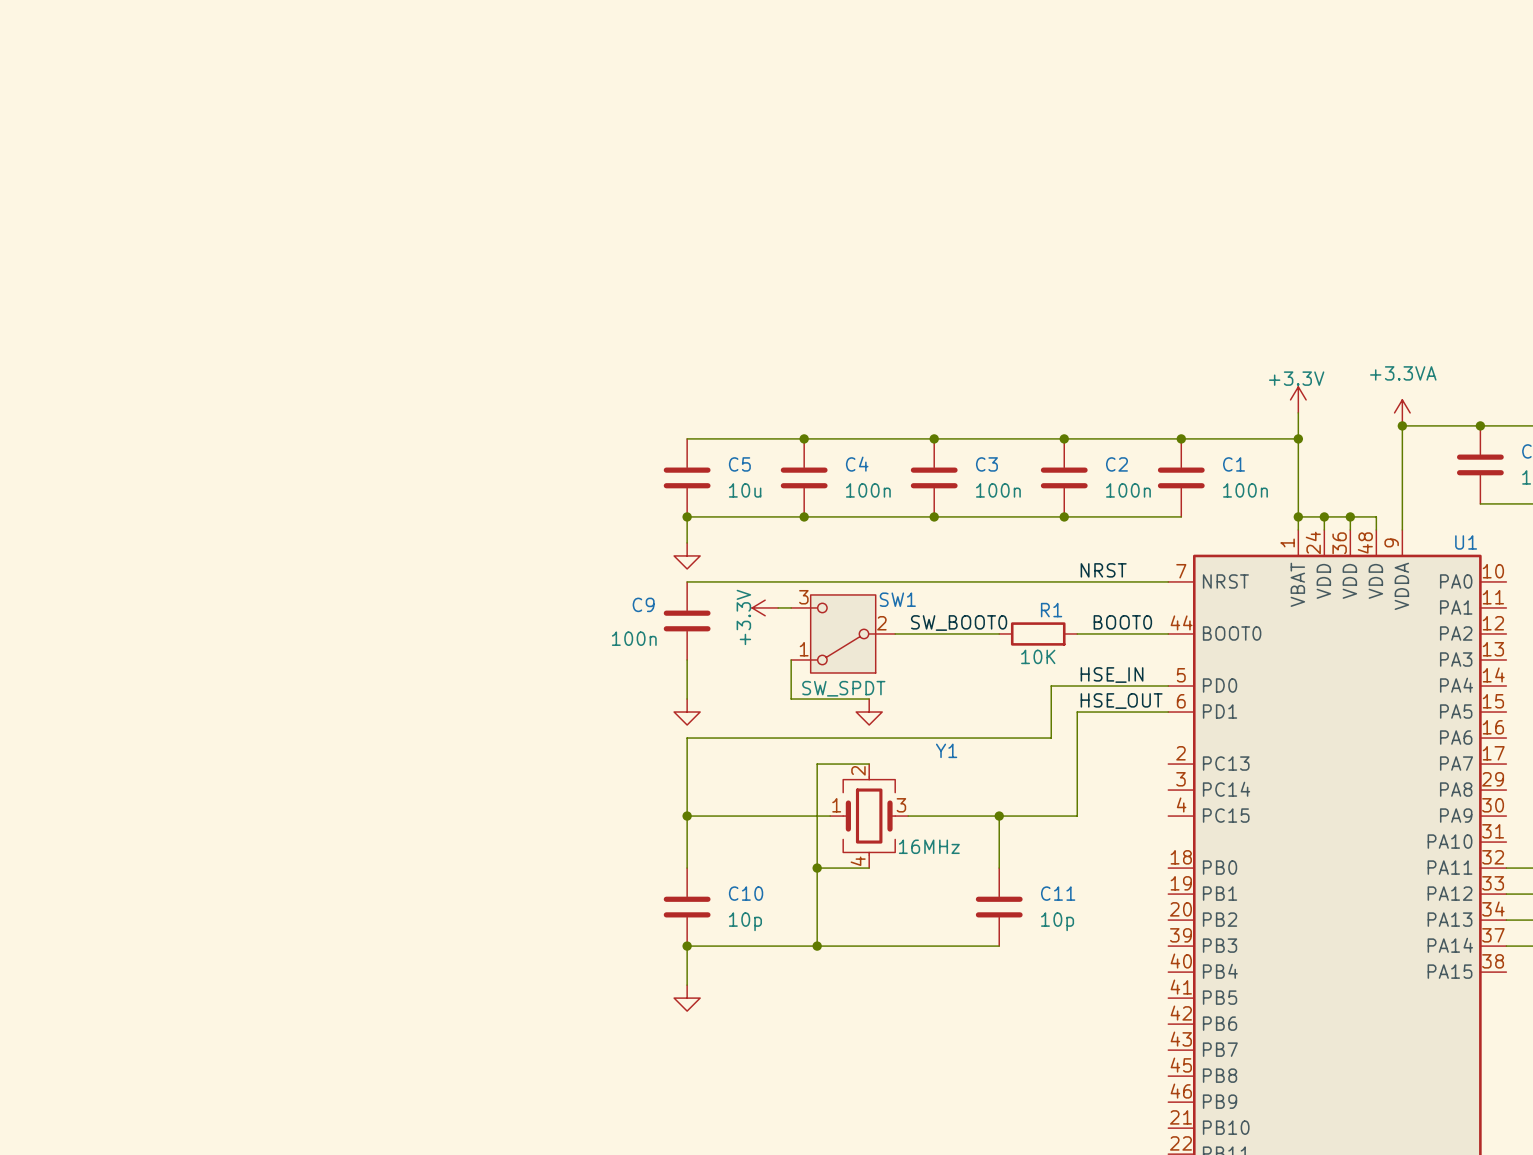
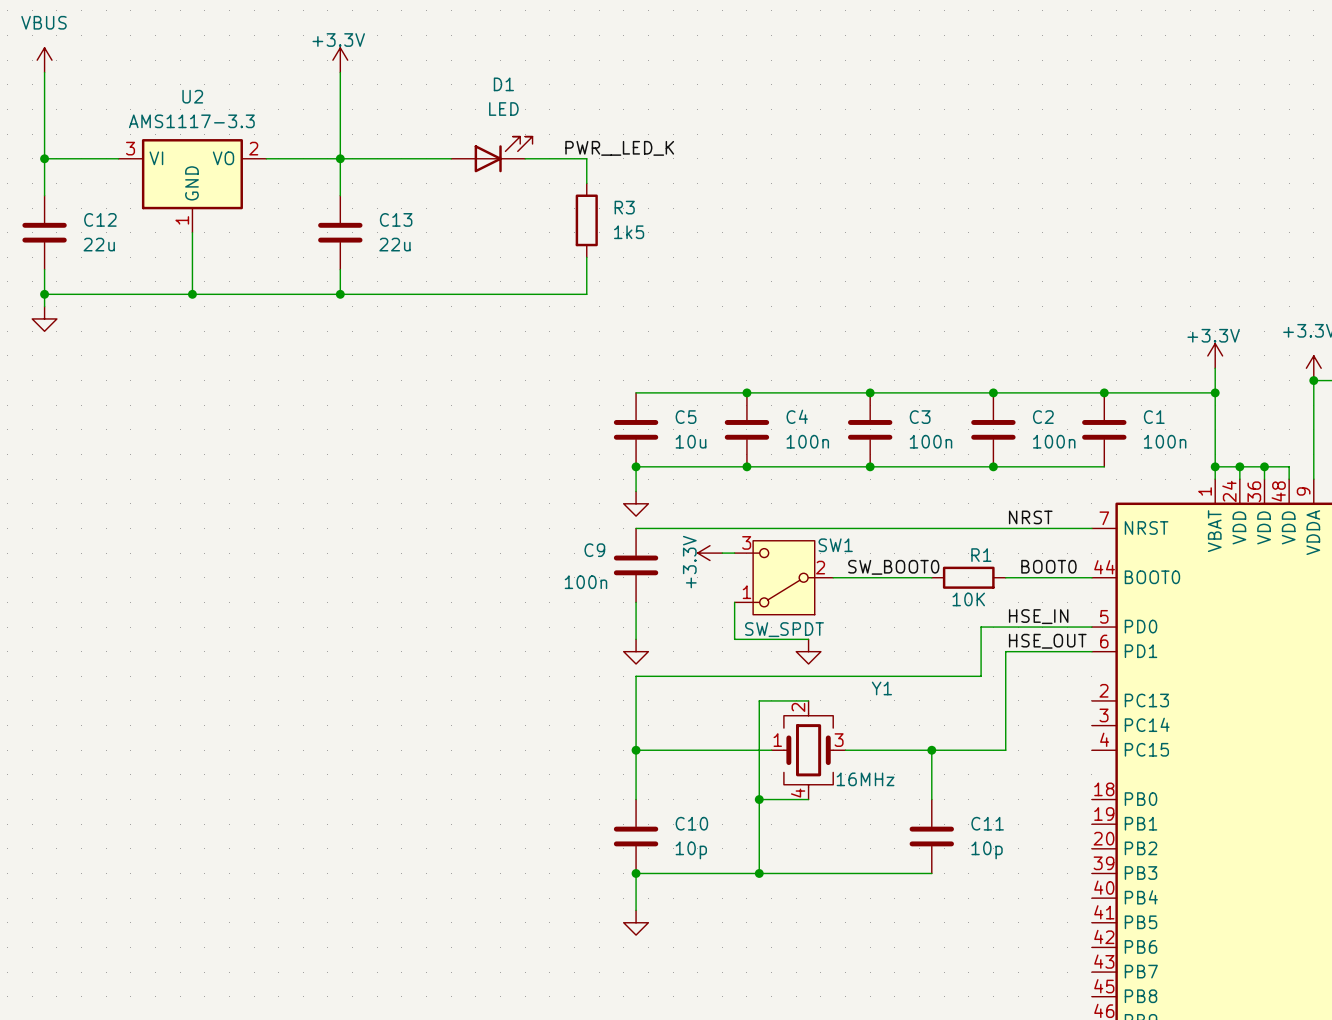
power symbol: none -> VBUS (44, 60)
power symbol: none -> +3.3V (340, 60)
wire: none -> (44, 72) (44, 195)
wire: none -> (340, 72) (340, 195)
label: none -> PWR__LED_K (619, 148)
D1: none -> LED (491, 154)
wire: none -> (44, 158) (118, 158)
junction: none -> (44, 158)
wire: none -> (266, 158) (451, 158)
junction: none -> (340, 158)
wire: none -> (525, 158) (586, 158) (586, 183)
U2: none -> AMS1117-3.3 (192, 185)
R3: none -> 1k5 (586, 220)
C12: none -> 22u (44, 232)
wire: none -> (192, 232) (192, 294)
C13: none -> 22u (340, 232)
wire: none -> (586, 257) (586, 294) (44, 294)
wire: none -> (44, 269) (44, 306)
wire: none -> (340, 269) (340, 294)
junction: none -> (44, 294)
junction: none -> (192, 294)
junction: none -> (340, 294)
power symbol: none -> (44, 318)

